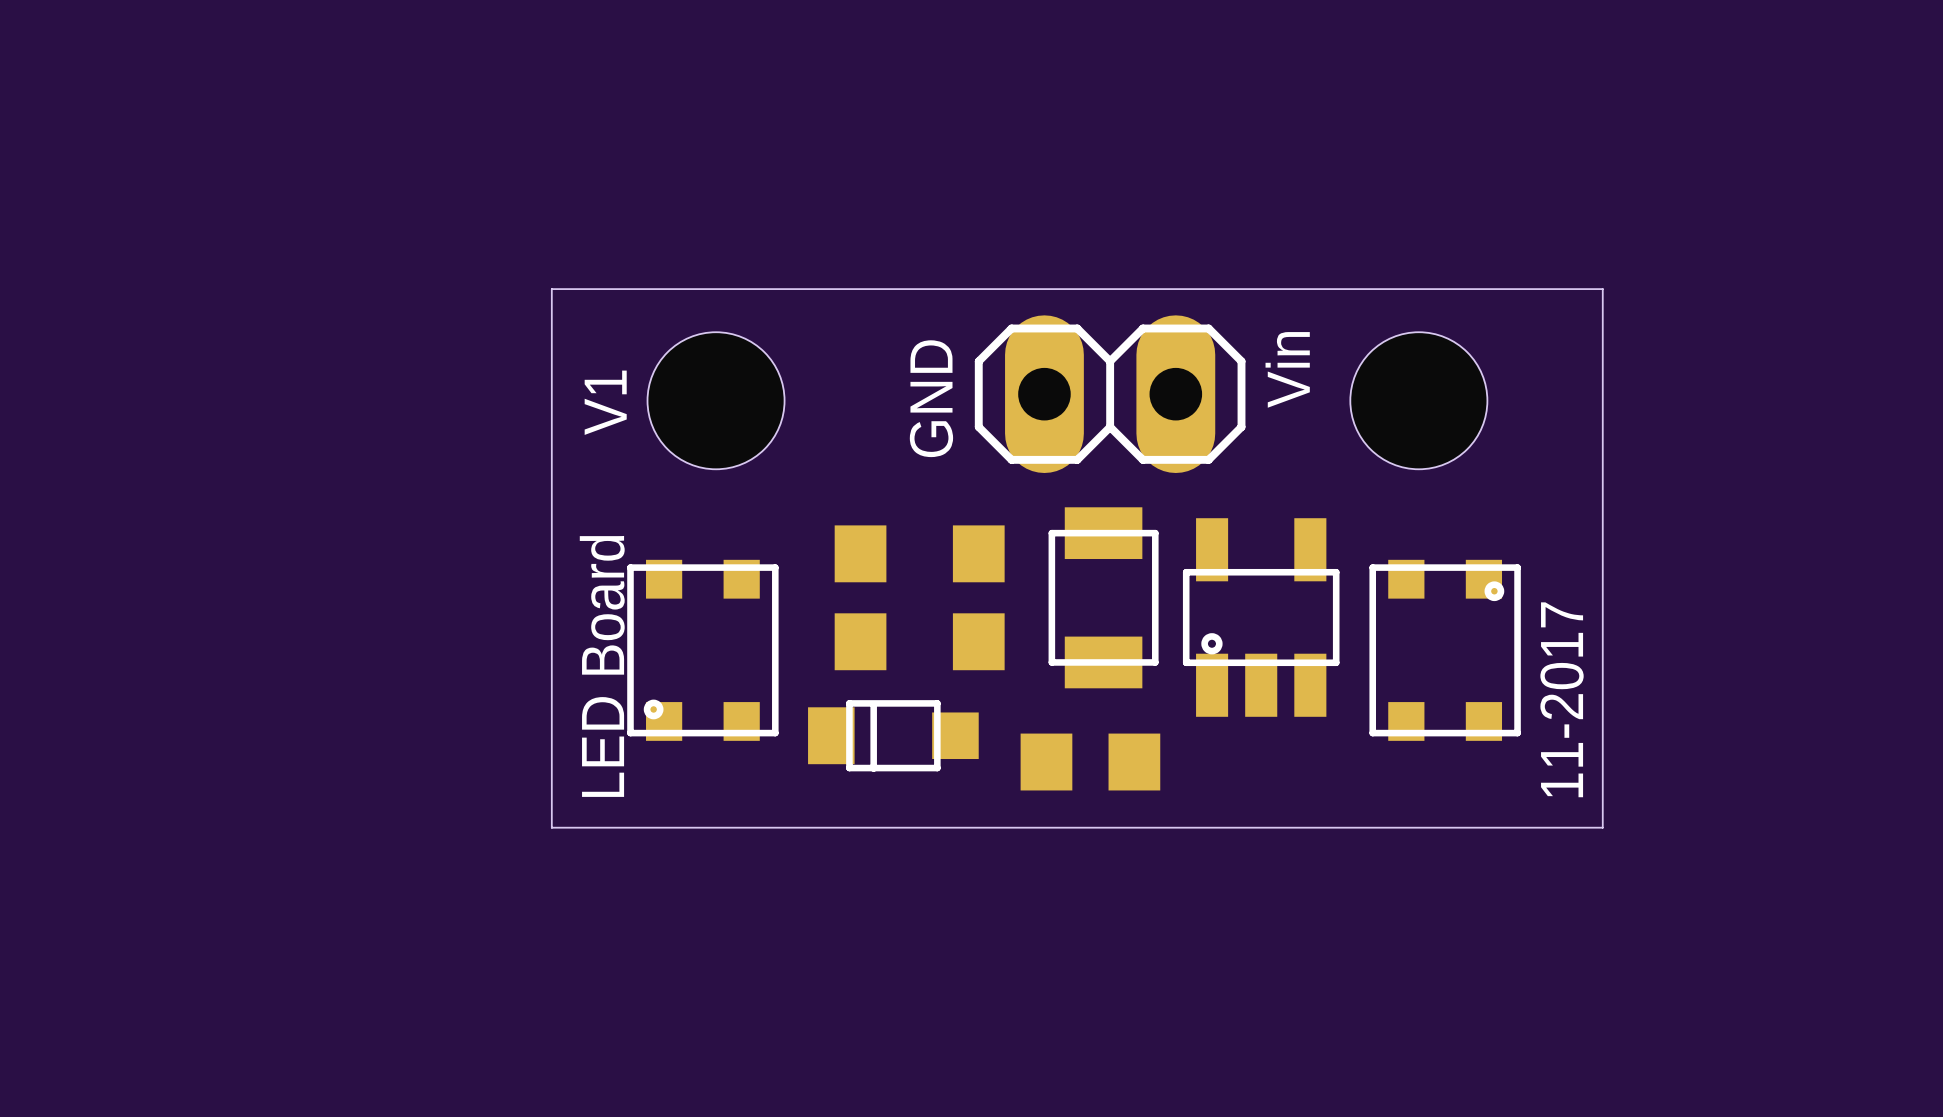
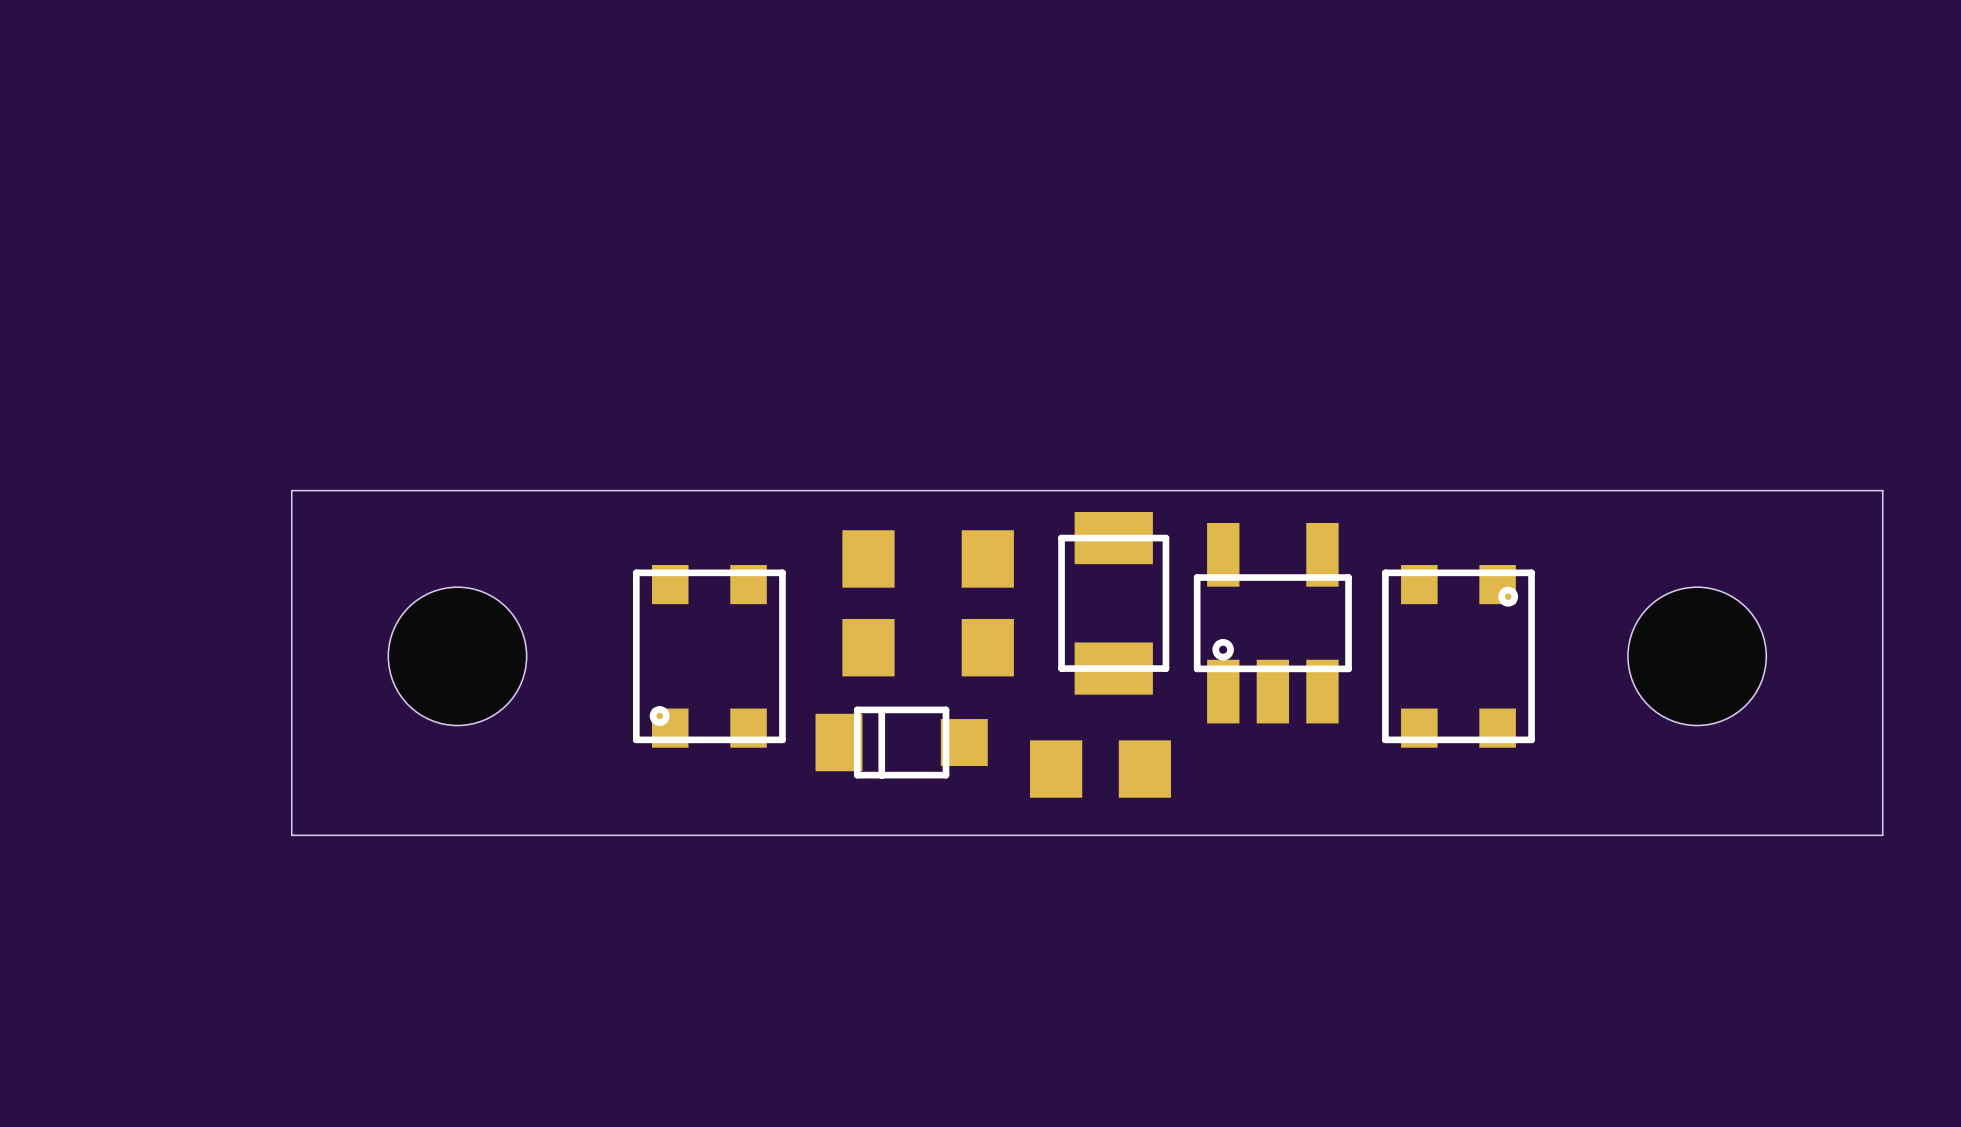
text: Vin (1287, 369) -> none
part: (1110, 394) -> none
text: GND (931, 398) -> none
hole position: (716, 400) -> (457, 656)
hole position: (1418, 400) -> (1697, 656)
text: V1 (605, 402) -> none
text: LED Board (602, 666) -> none
text: 11-2017 (1562, 699) -> none
board edge: (551, 827) (551, 289) (1602, 289) (1602, 827) -> (556, 835) (291, 835) (291, 490) (1882, 490) (1882, 835) (1617, 835)

